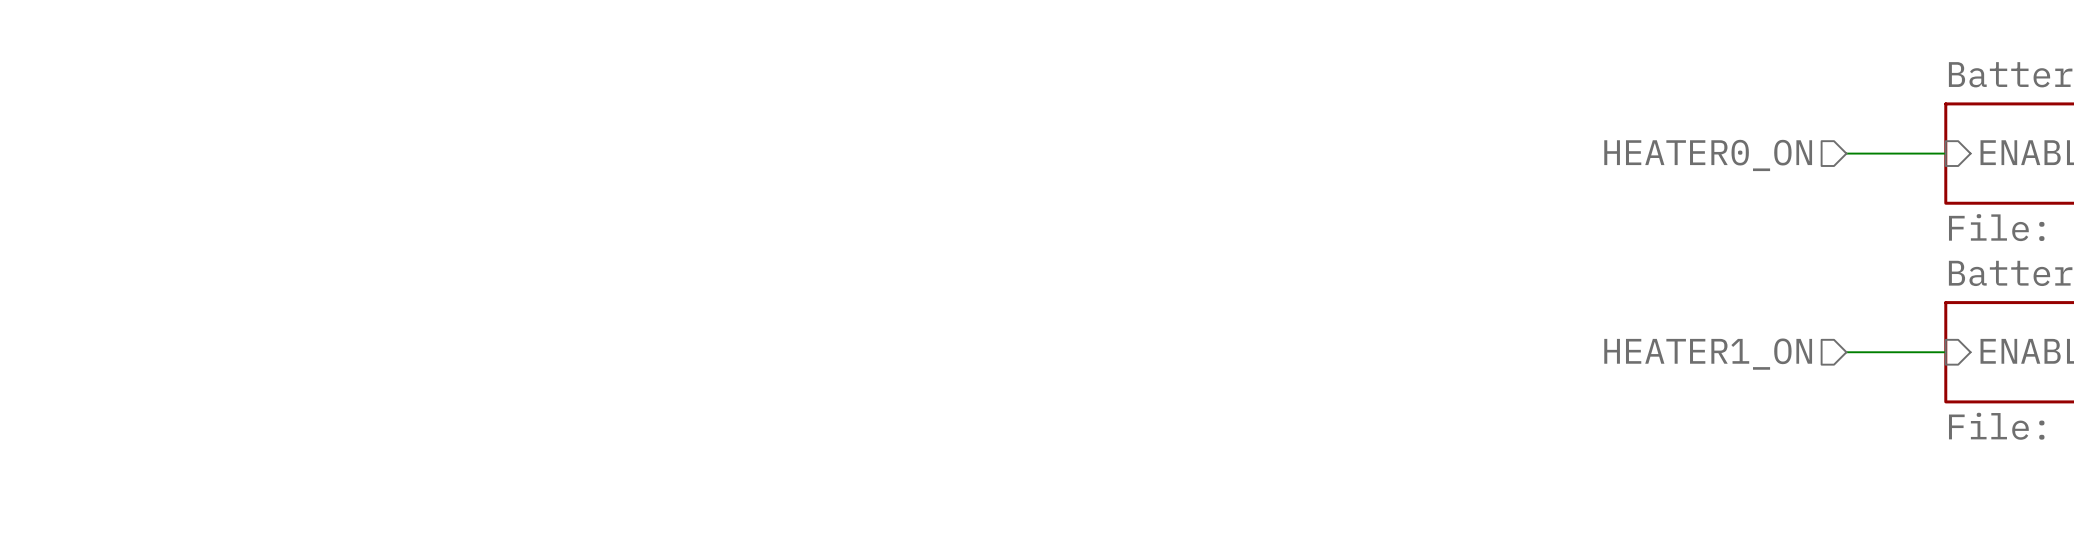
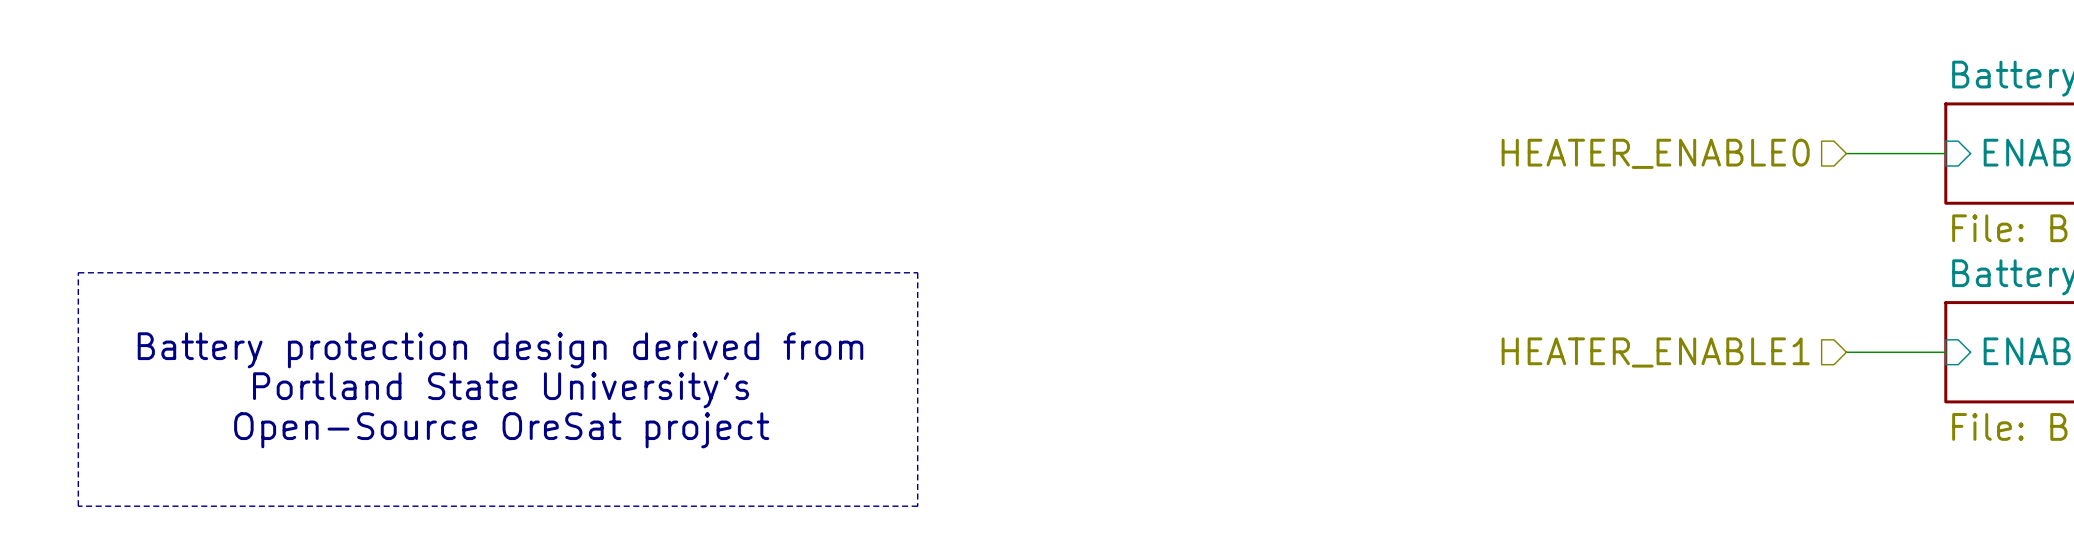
hierarchical label: HEATER0_ON (1708, 155) -> HEATER_ENABLE0 (1655, 153)
line: none -> (78, 272) (917, 272) (917, 506) (78, 506) (78, 272)
text: none -> Battery protection design derived from (500, 350)
hierarchical label: HEATER1_ON (1708, 354) -> HEATER_ENABLE1 (1655, 352)
text: none -> Portland State University's (501, 390)
text: none -> Open-Source OreSat project (501, 430)

